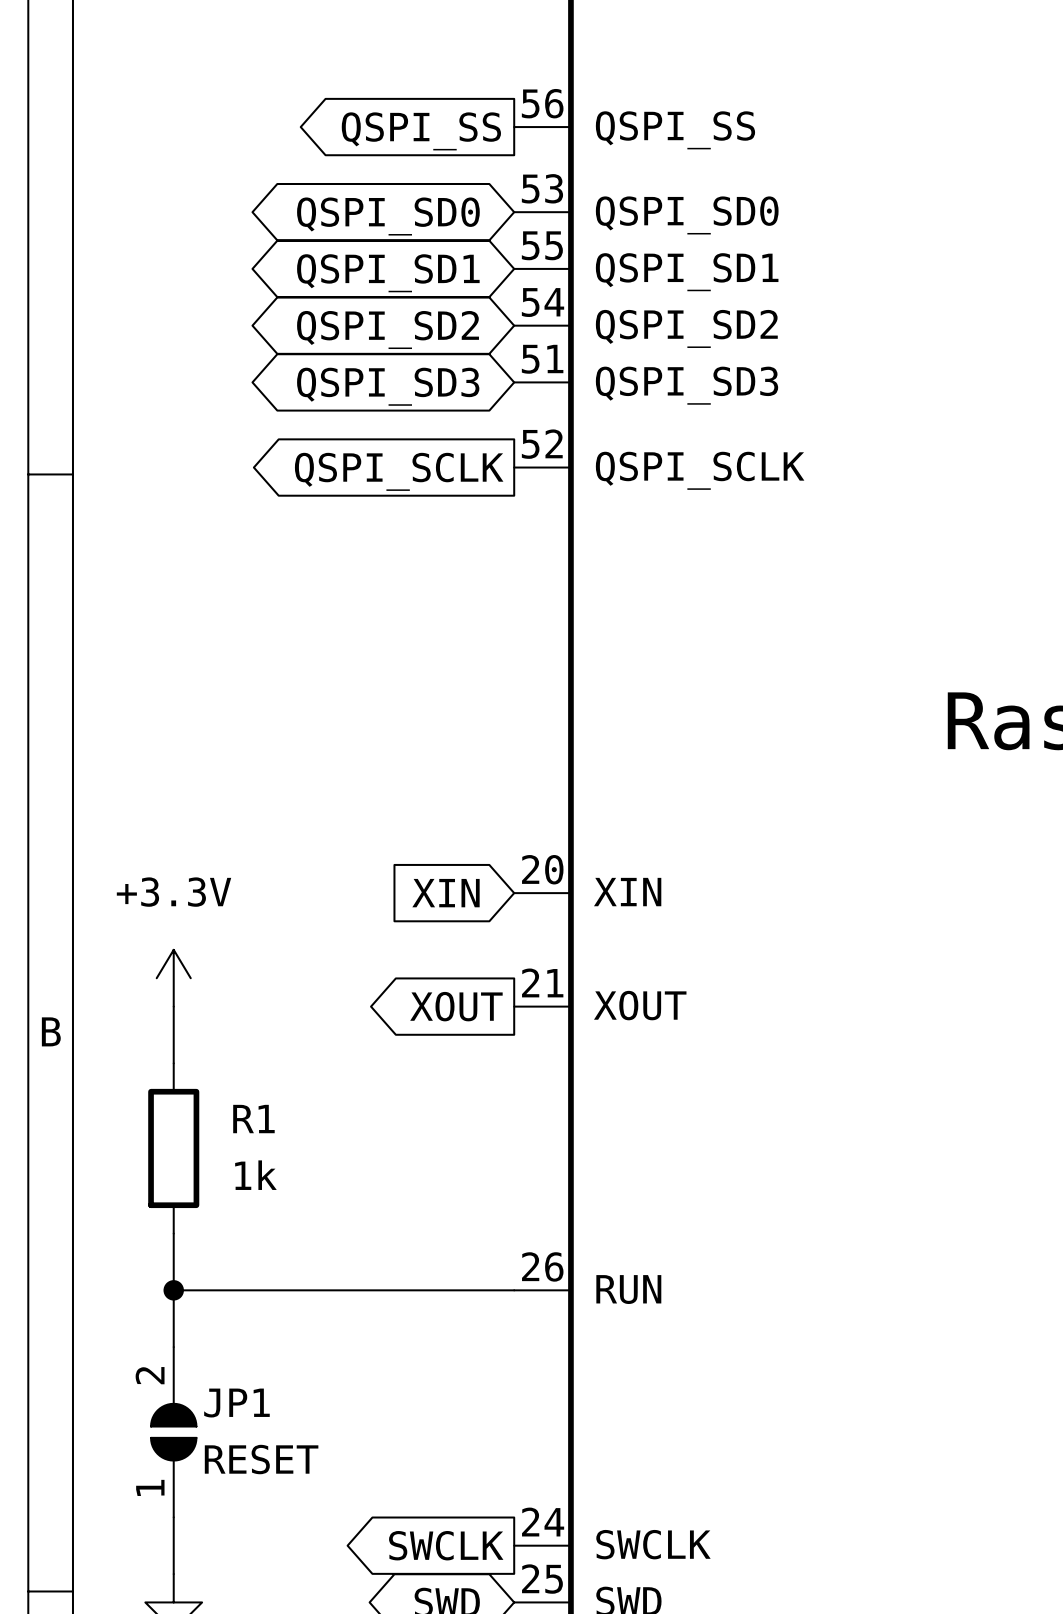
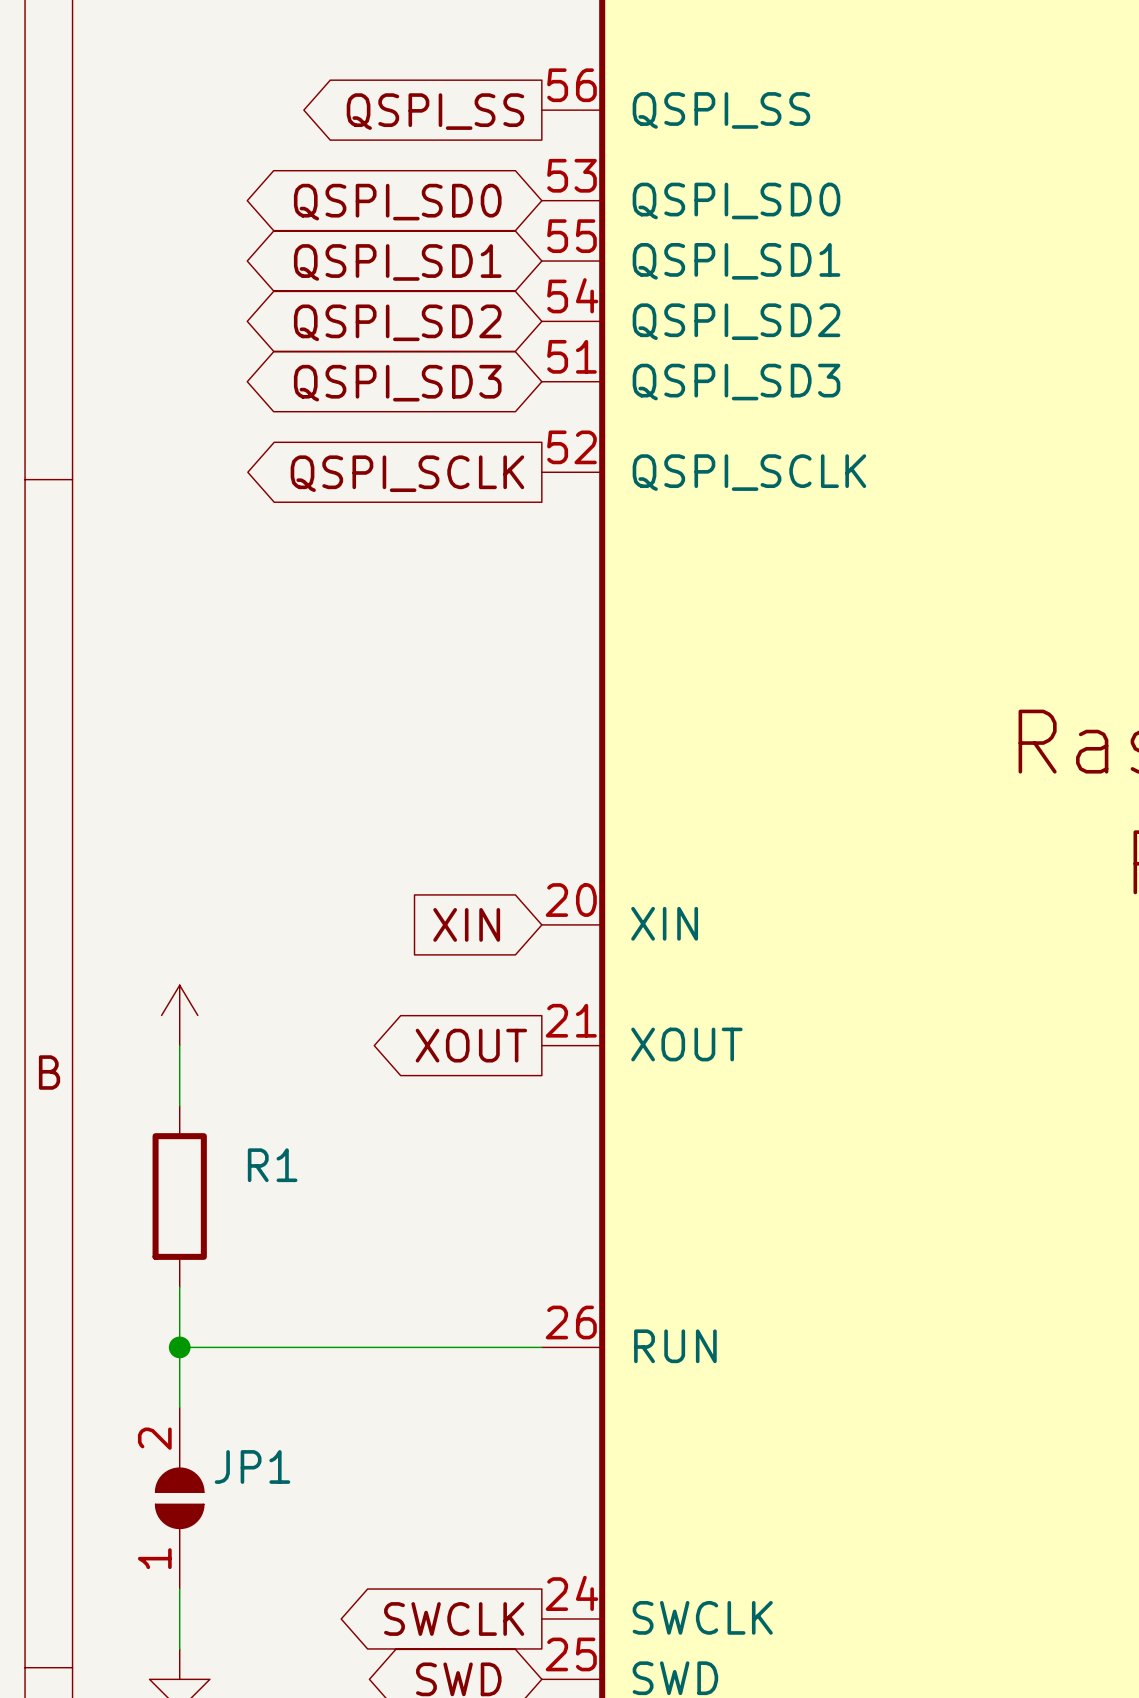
power symbol text: +3.3V (174, 892) -> none
R1 value: 1k (255, 1175) -> none
JP1 value: RESET (261, 1459) -> none

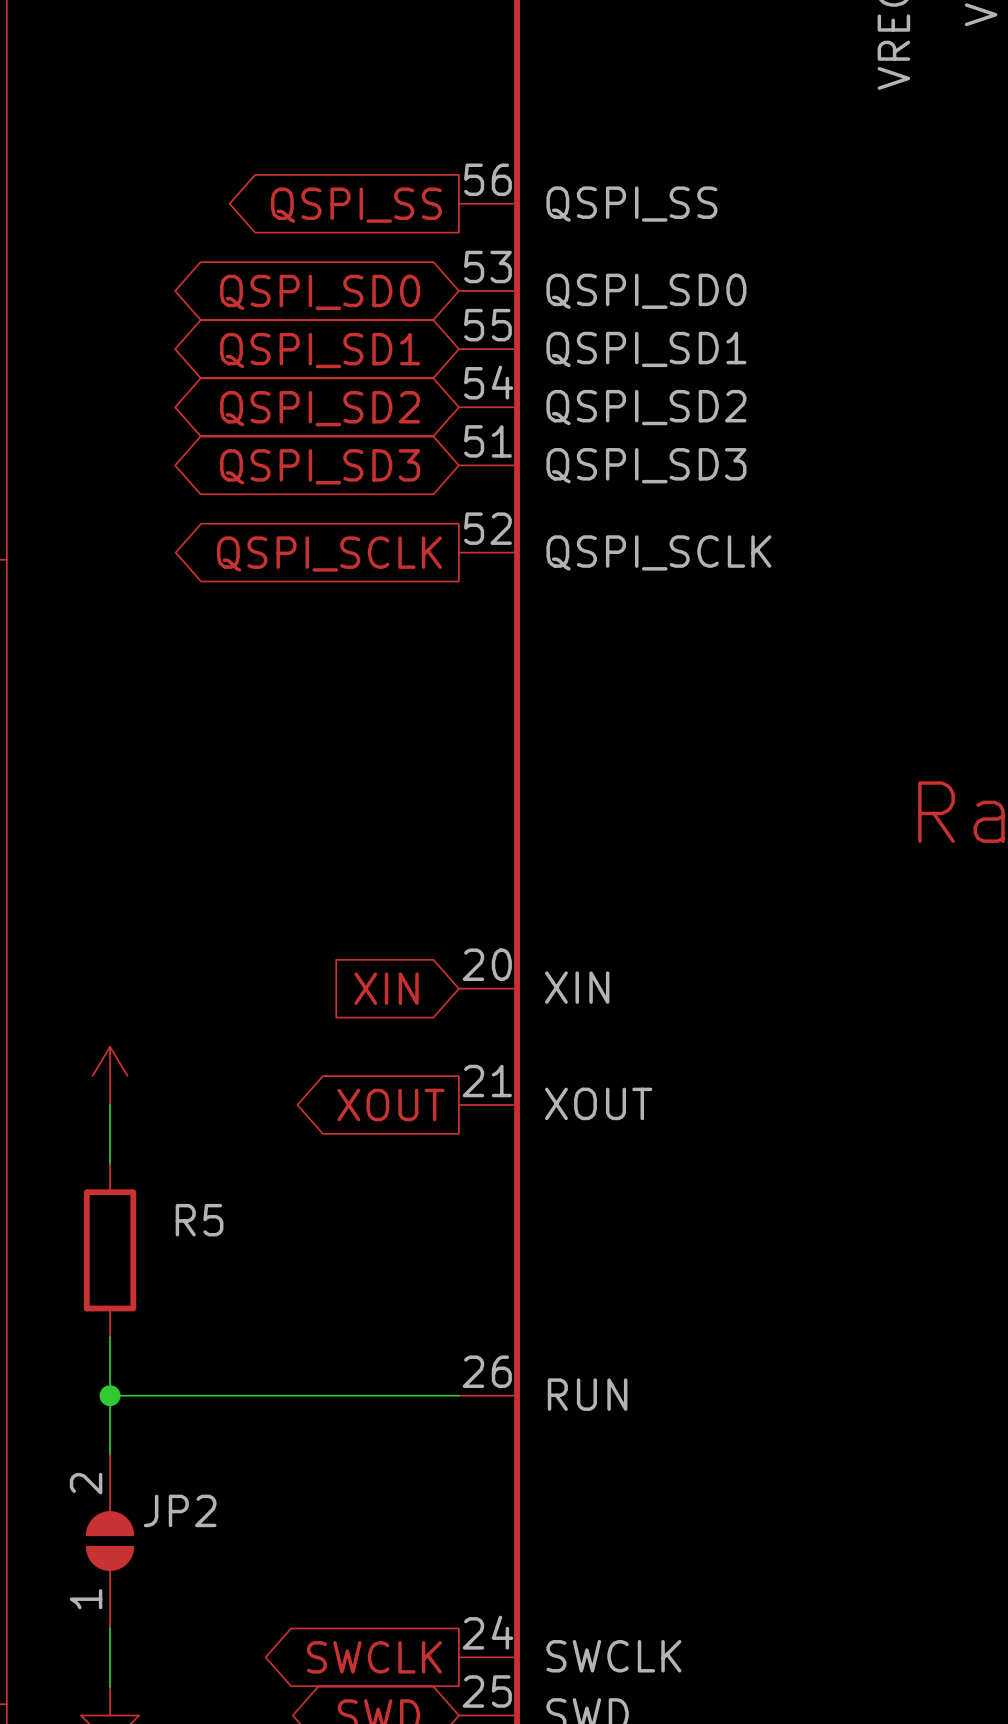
R1 name: R1 (272, 1165) -> R5 (199, 1220)
JP1 name: JP1 (252, 1466) -> JP2 (180, 1510)

